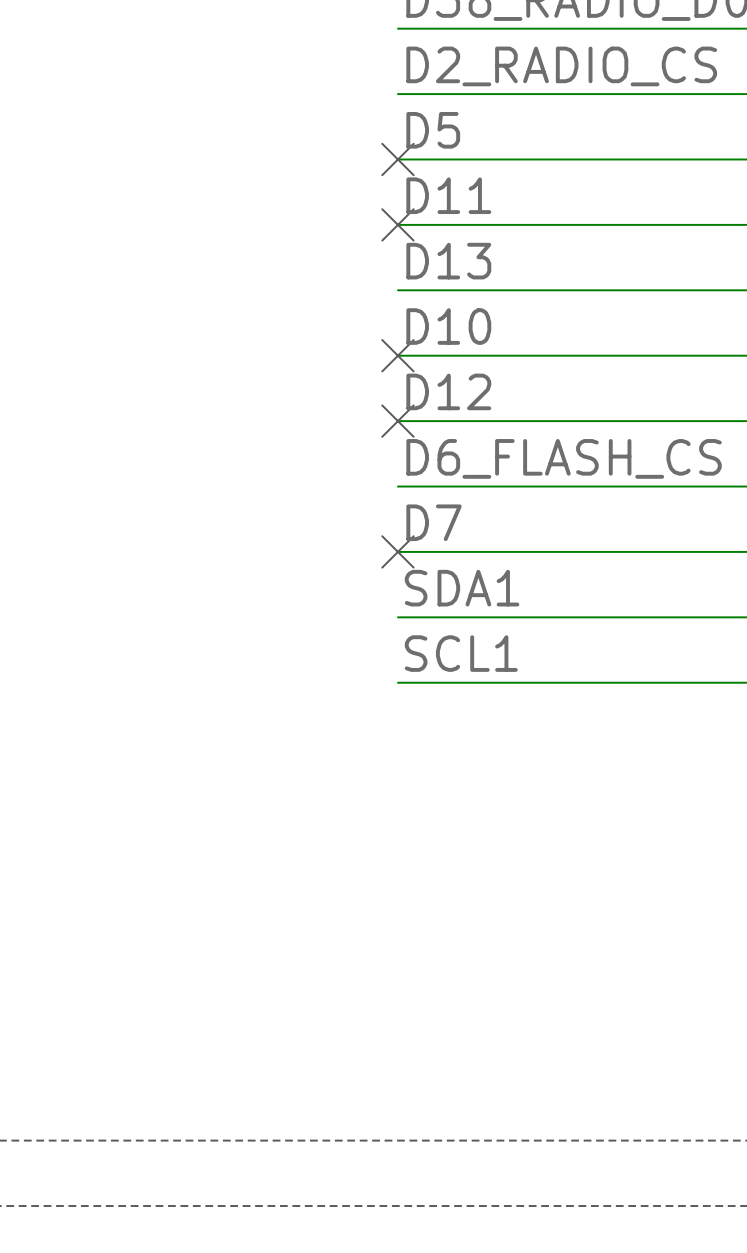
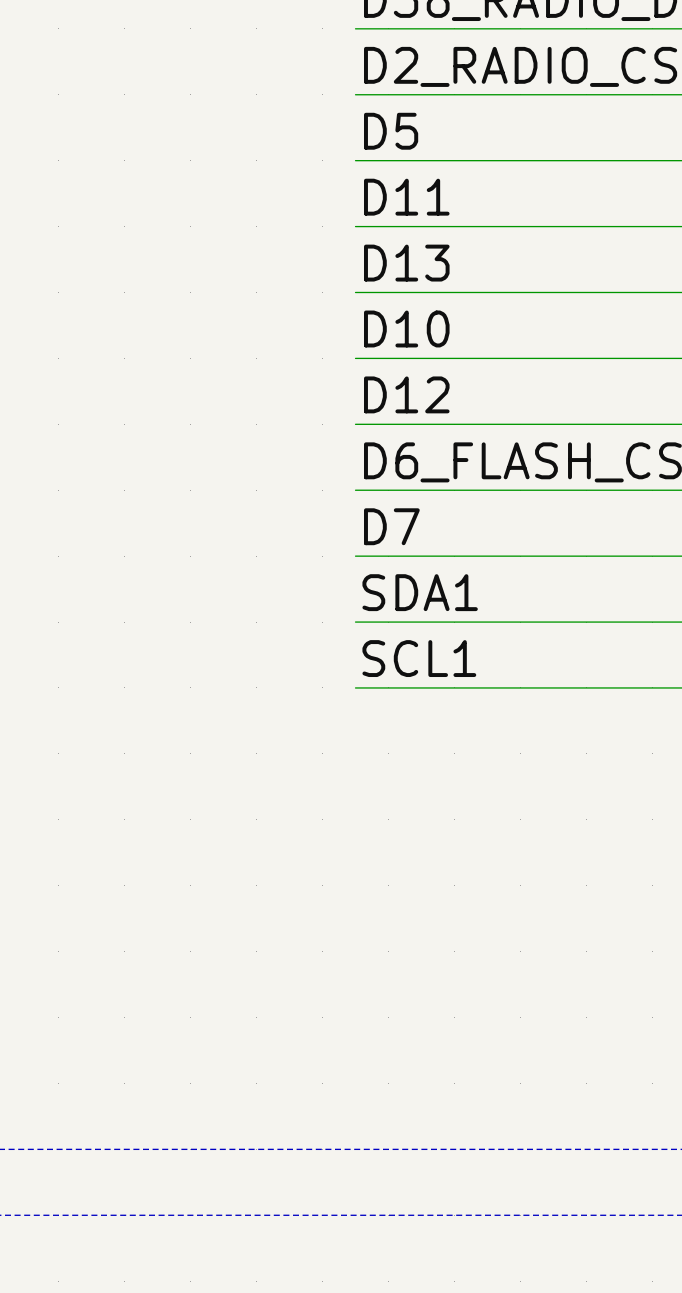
no-connect mark: (397, 159) -> none
no-connect mark: (397, 224) -> none
no-connect mark: (397, 355) -> none
no-connect mark: (397, 421) -> none
no-connect mark: (397, 551) -> none

